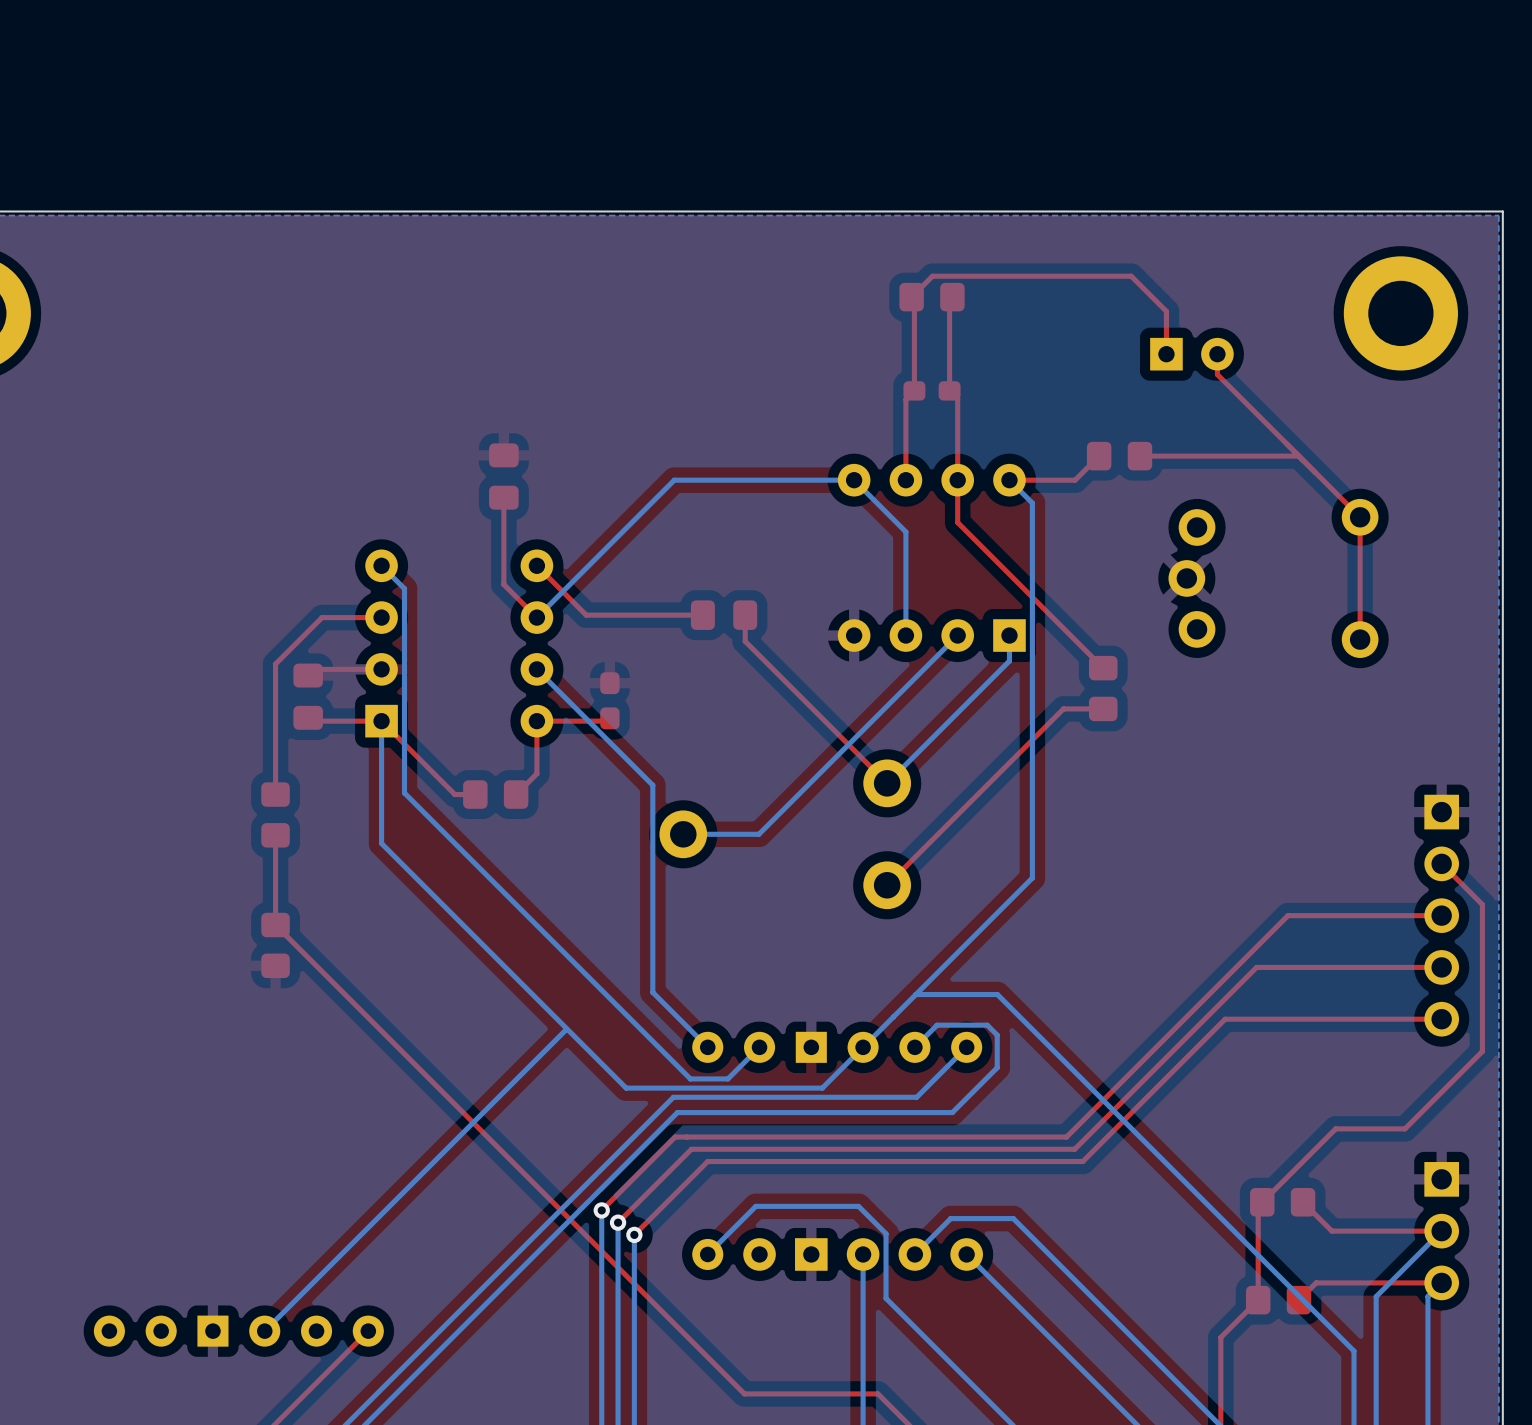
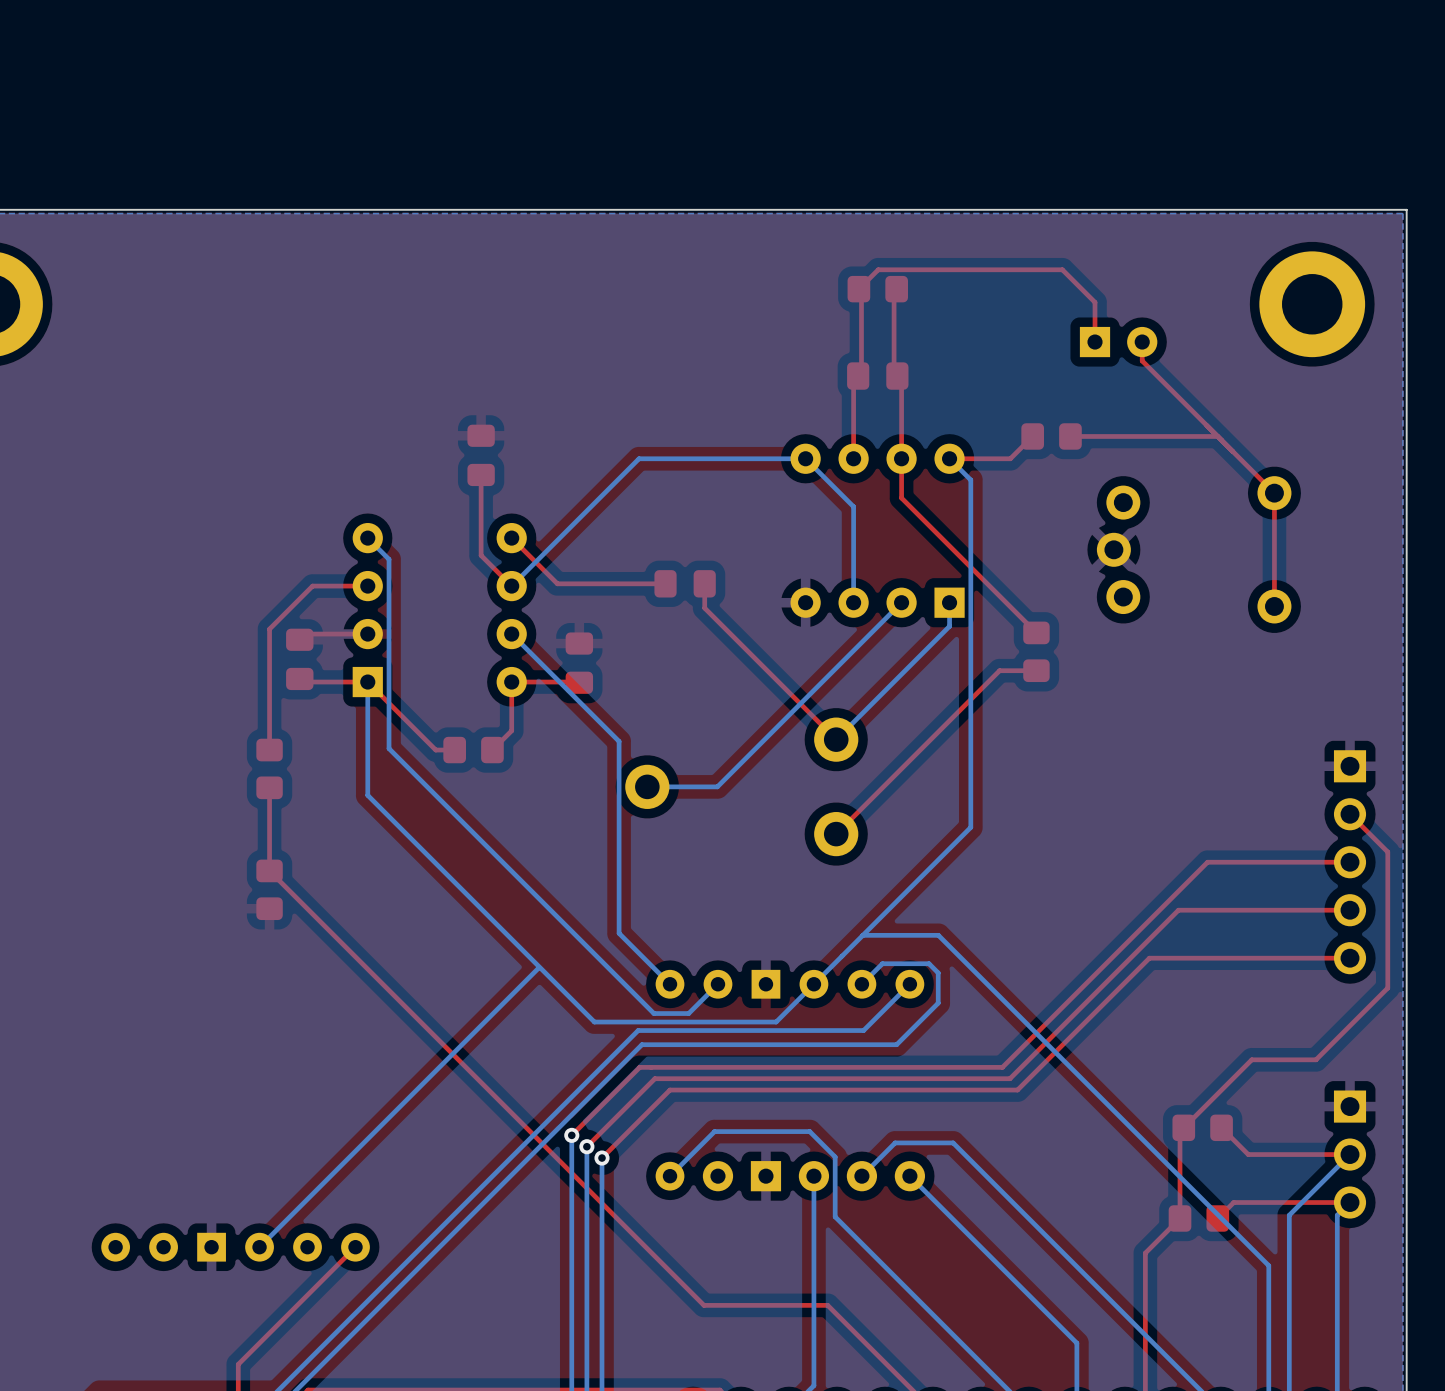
part footprint: [903, 381, 961, 401] -> [847, 362, 909, 390]
part footprint: [600, 672, 620, 730] -> [565, 632, 594, 694]

